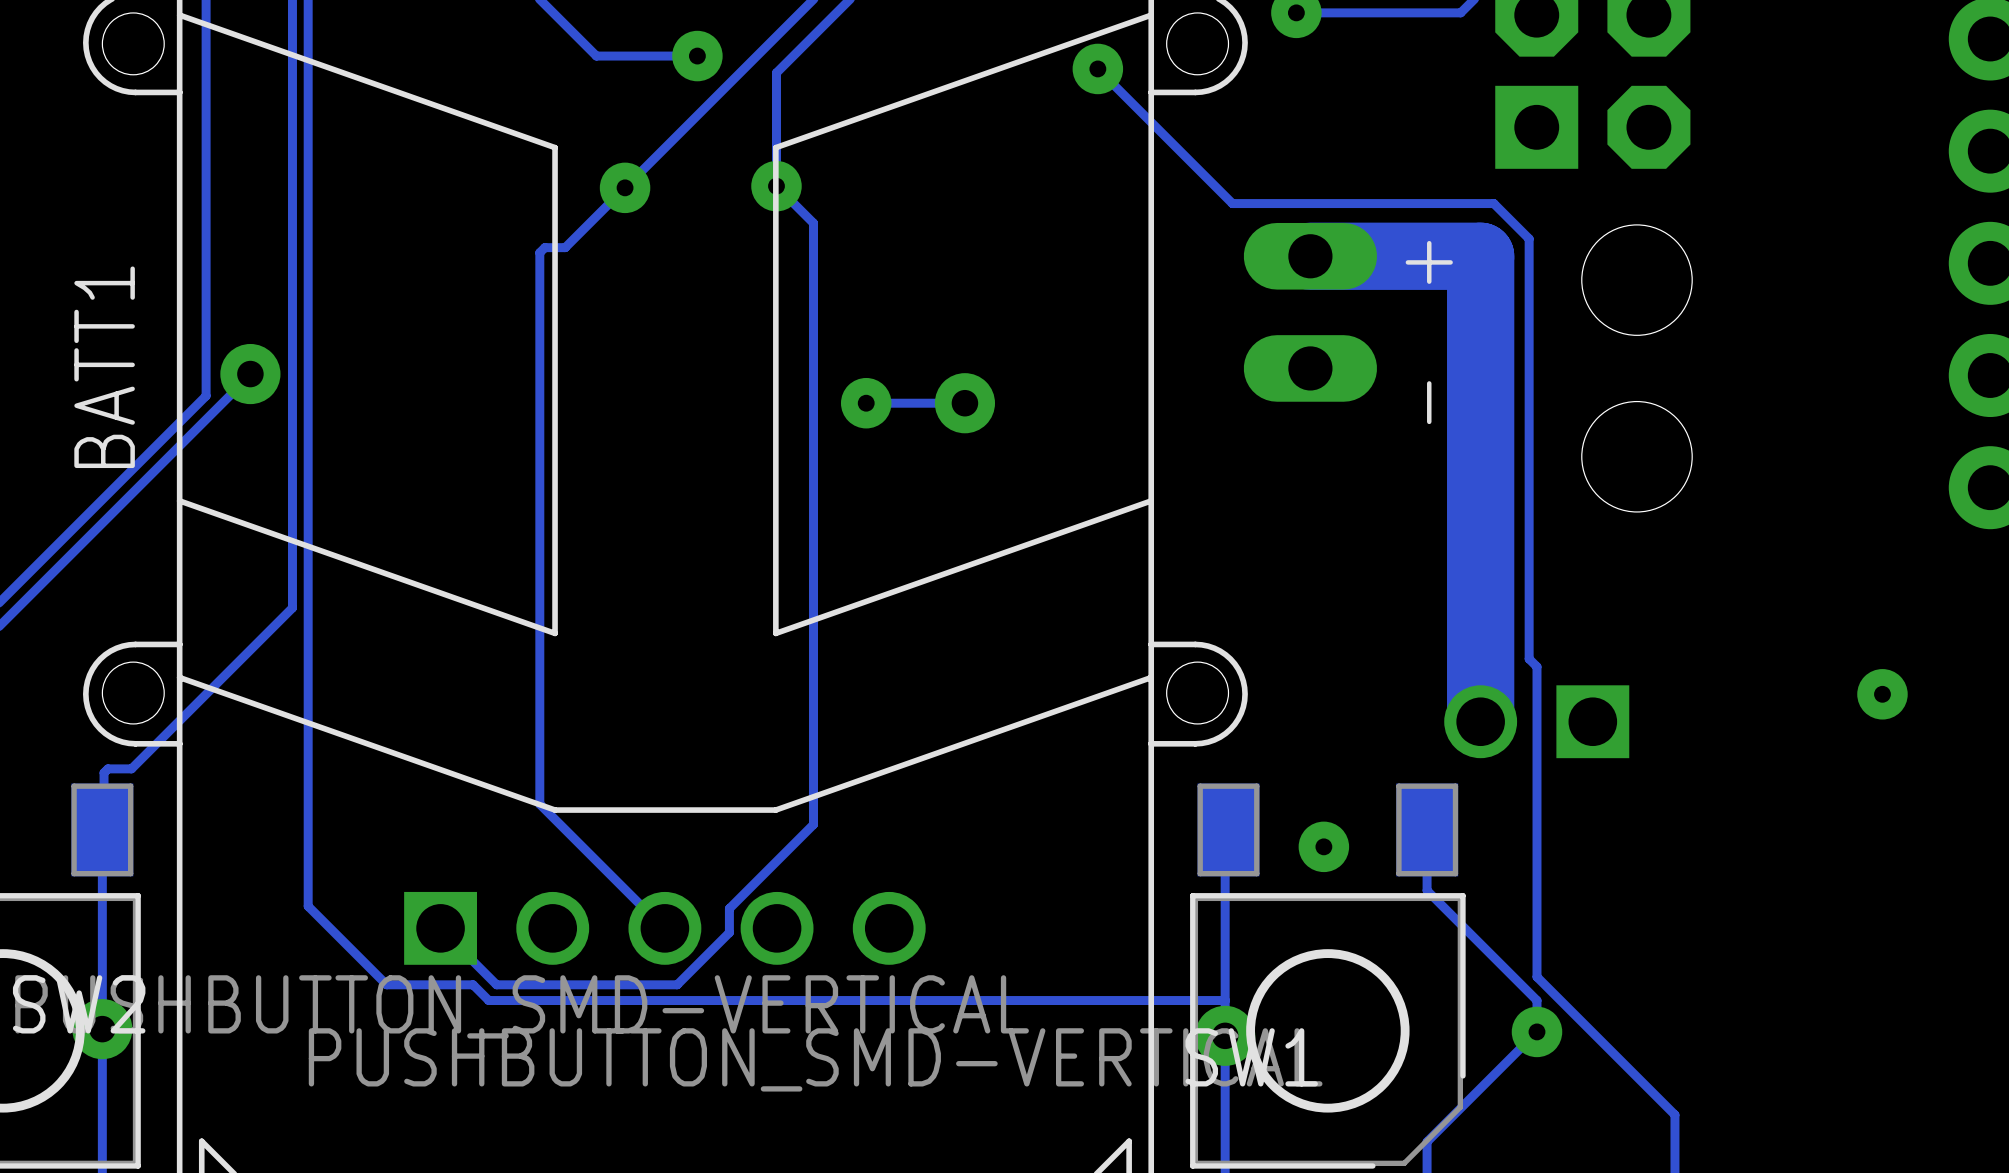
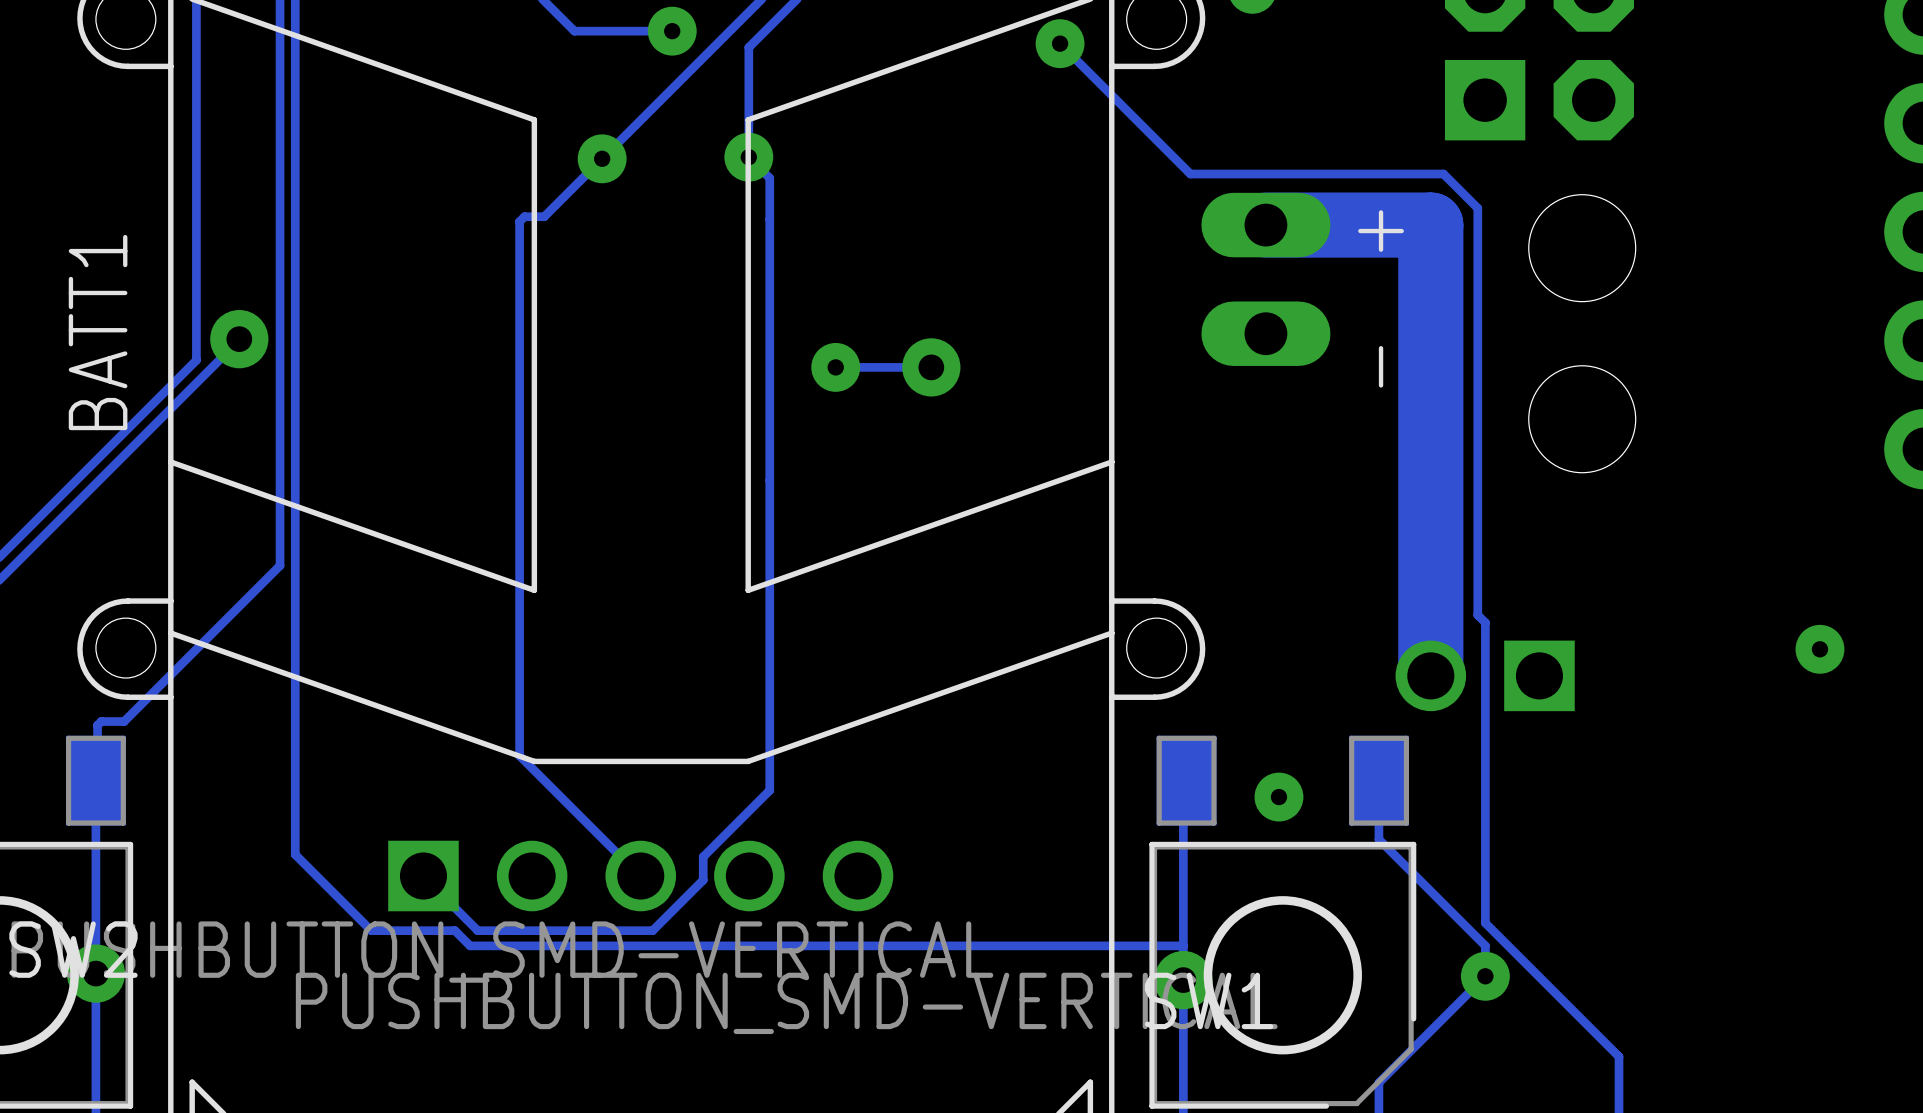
track: (798, 207) (813, 223) (813, 824) (798, 839) -> (769, 178) (769, 790)

